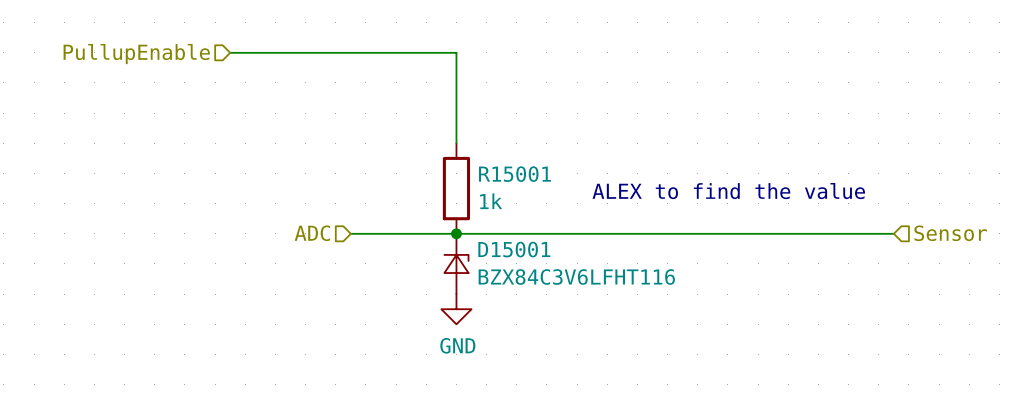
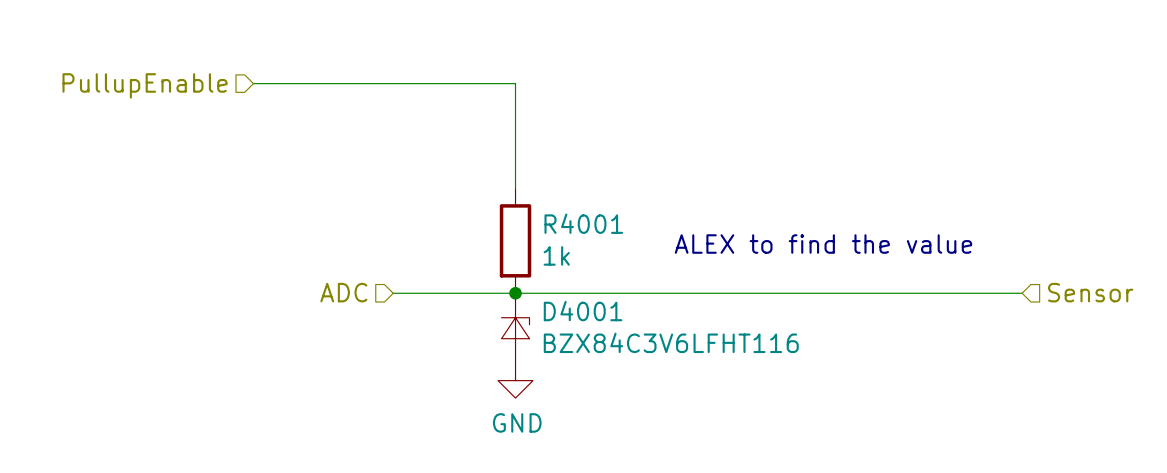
R15001 name: R15001 (514, 174) -> R4001 (583, 223)
D15001 name: D15001 (514, 249) -> D4001 (583, 311)

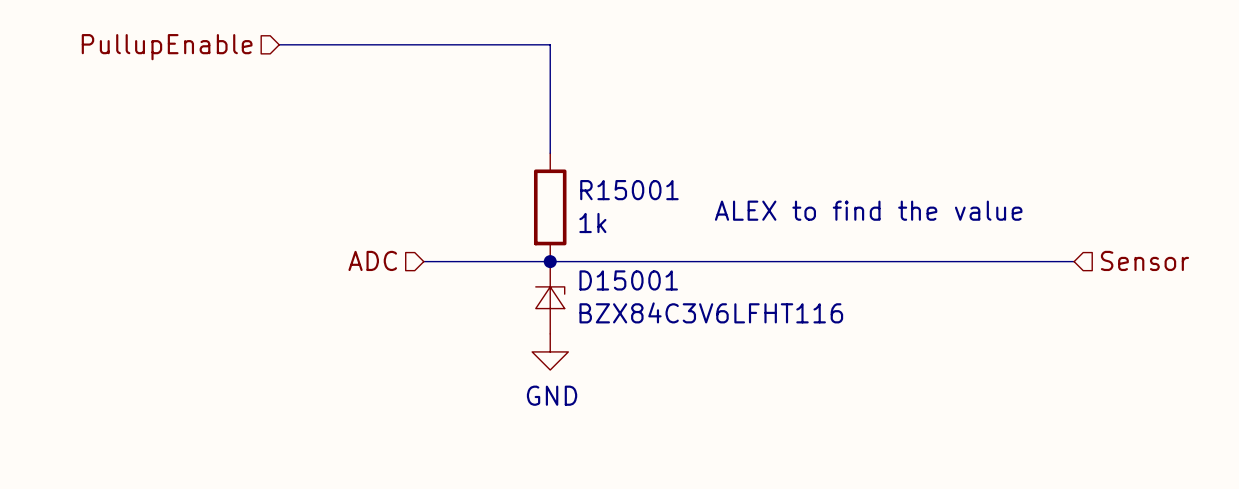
R4001 name: R4001 (583, 223) -> R15001 (629, 190)
D4001 name: D4001 (583, 311) -> D15001 (628, 280)

